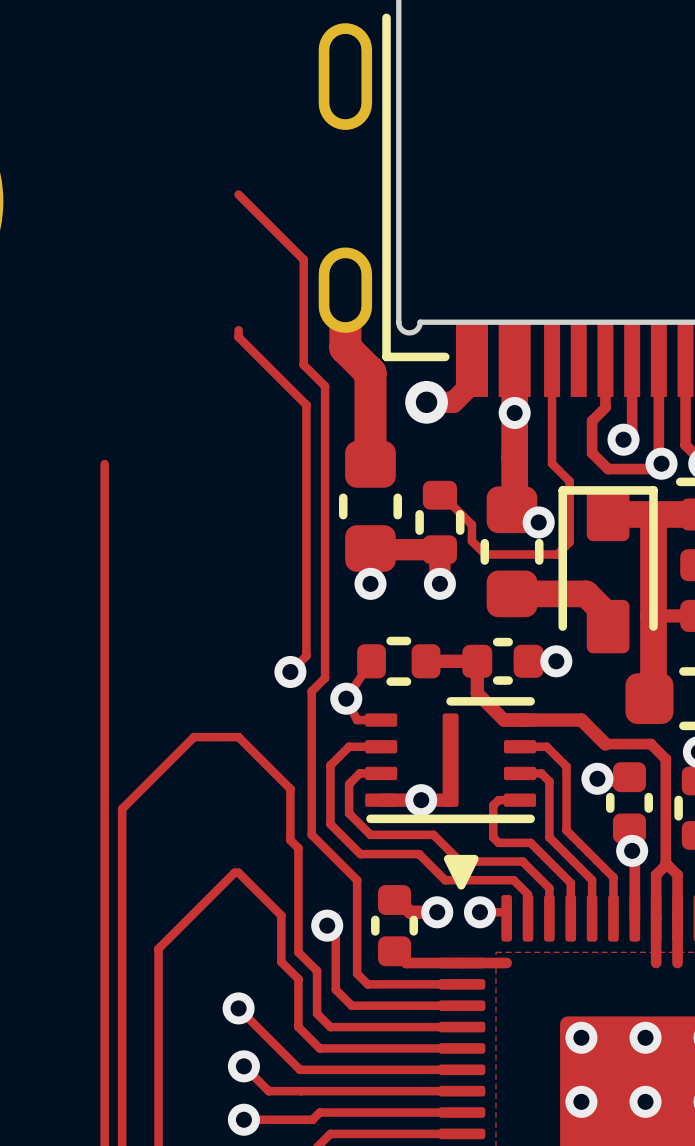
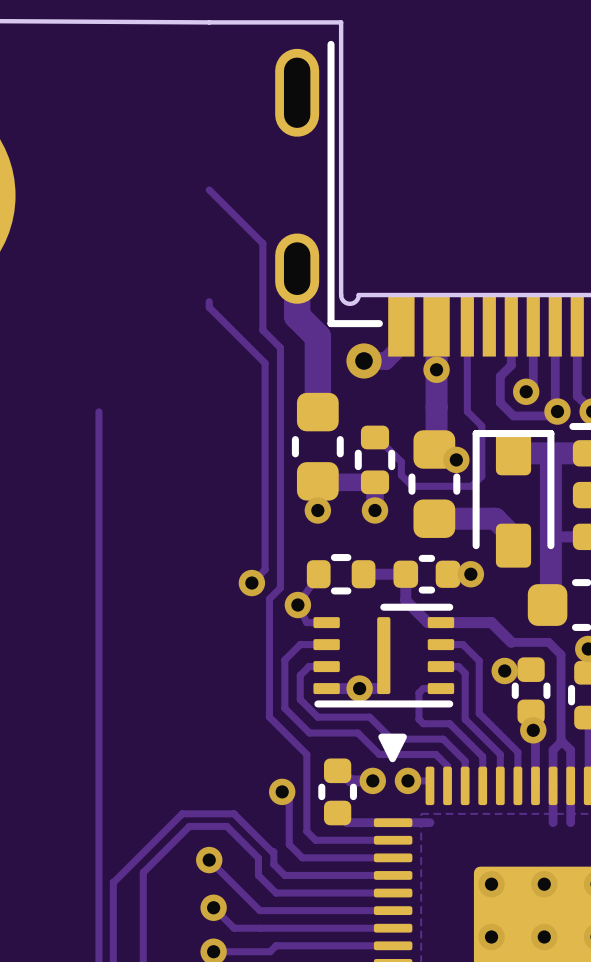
track: (317, 998) (317, 971) (298, 952) (298, 848) (290, 840) (290, 788) (238, 737) (194, 737) (122, 808) (122, 1035) -> (273, 851) (234, 813) (182, 813) (113, 882)
track: (298, 1006) (298, 979) (281, 961) (281, 915) (238, 872) (234, 872) (158, 948) (158, 1023) -> (258, 858) (226, 826) (189, 826) (143, 872)

